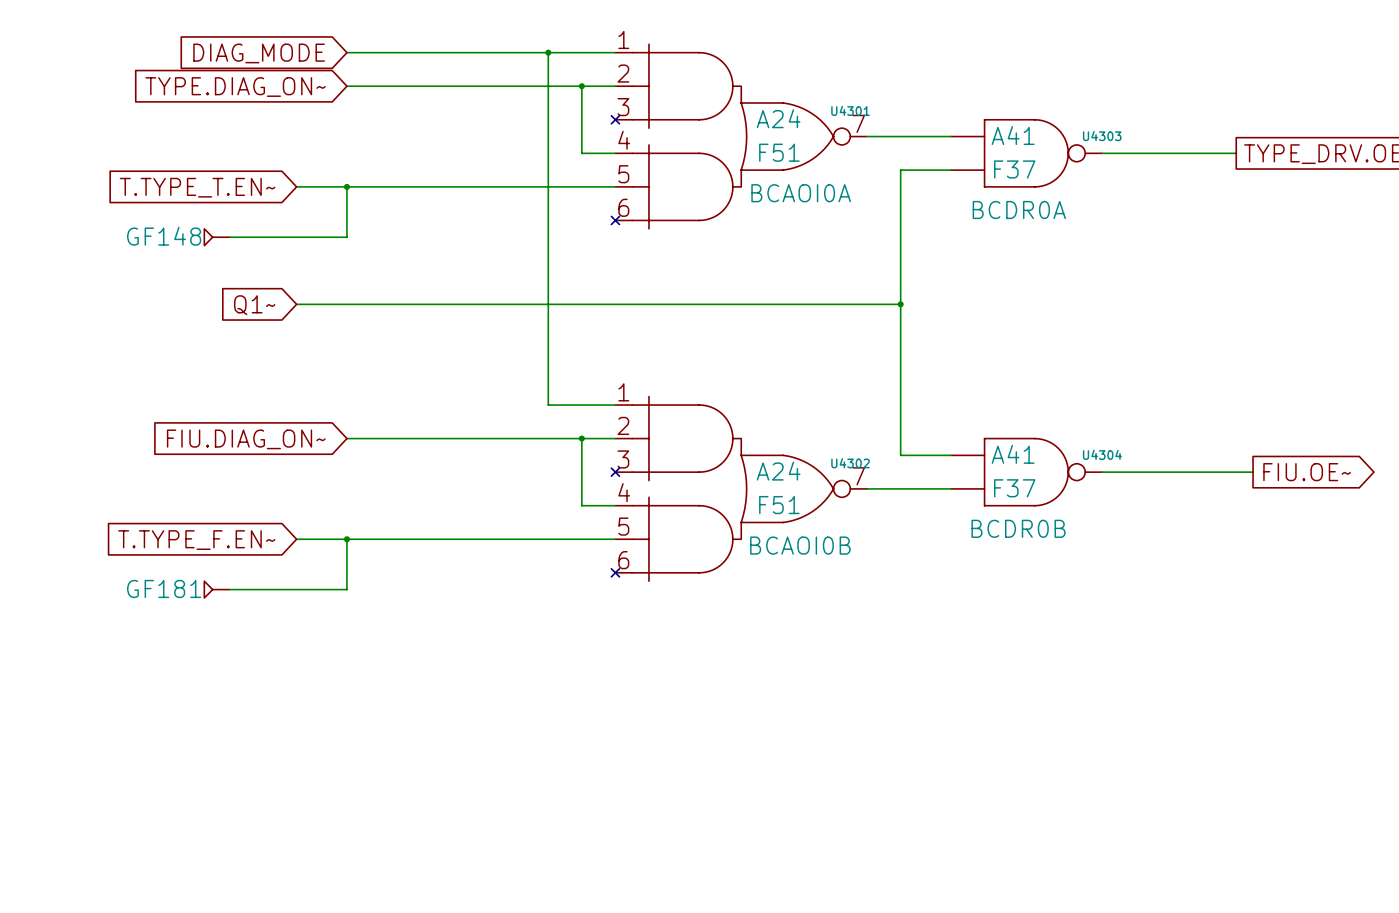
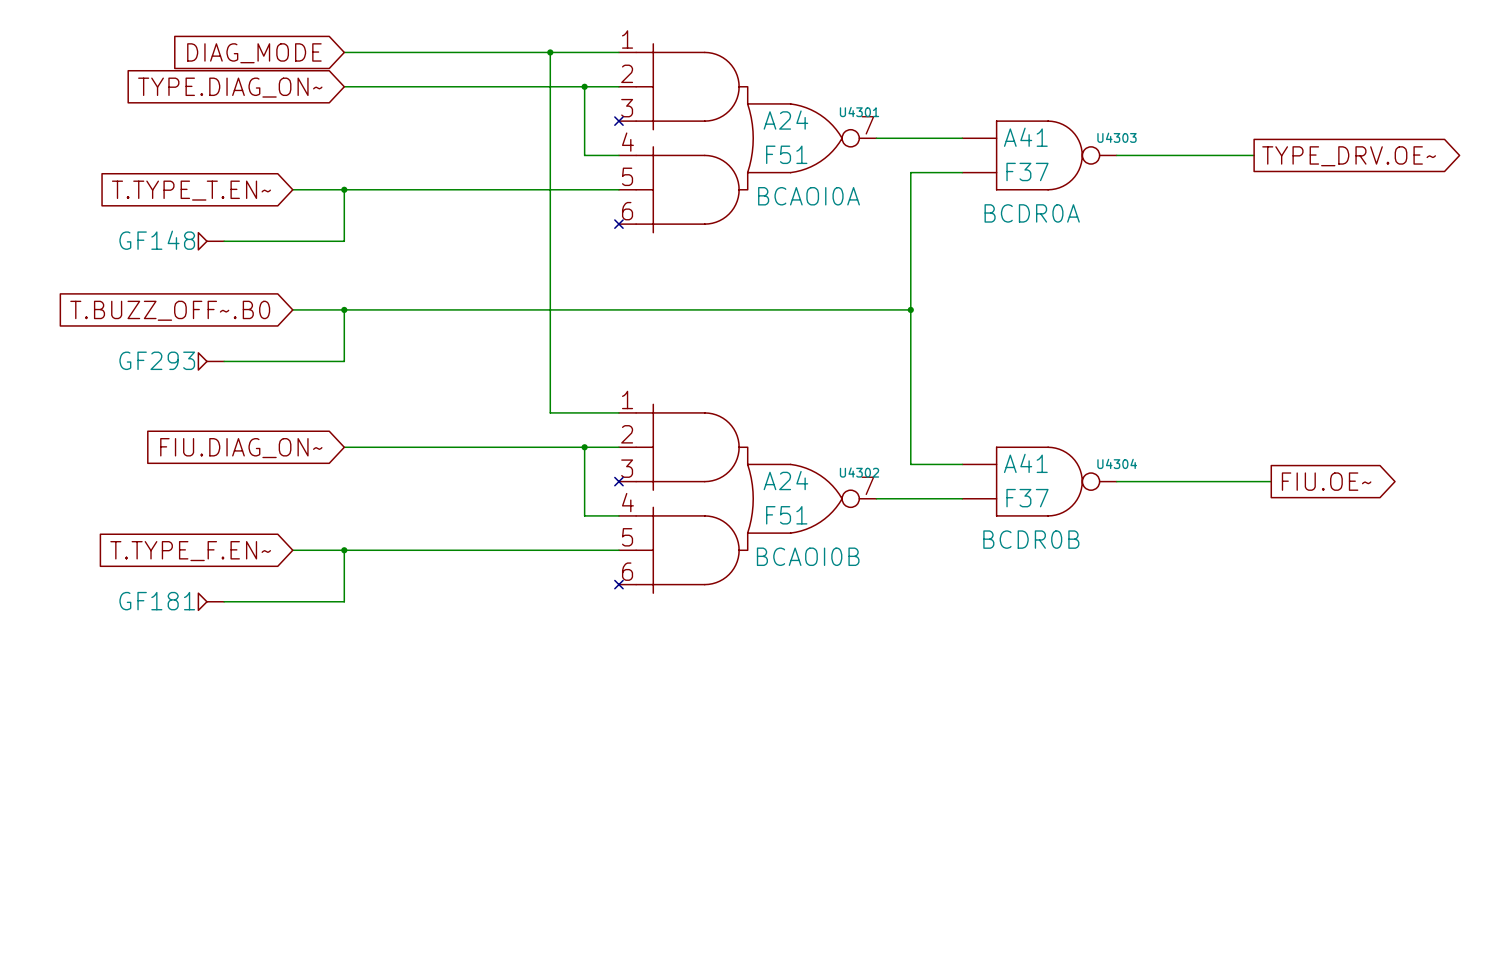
wire: none -> (344, 309) (344, 361) (224, 361)
junction: none -> (344, 309)
global label: Q1~ (254, 305) -> T.BUZZ_OFF~.B0 (170, 310)
GF293: none -> (211, 361)

